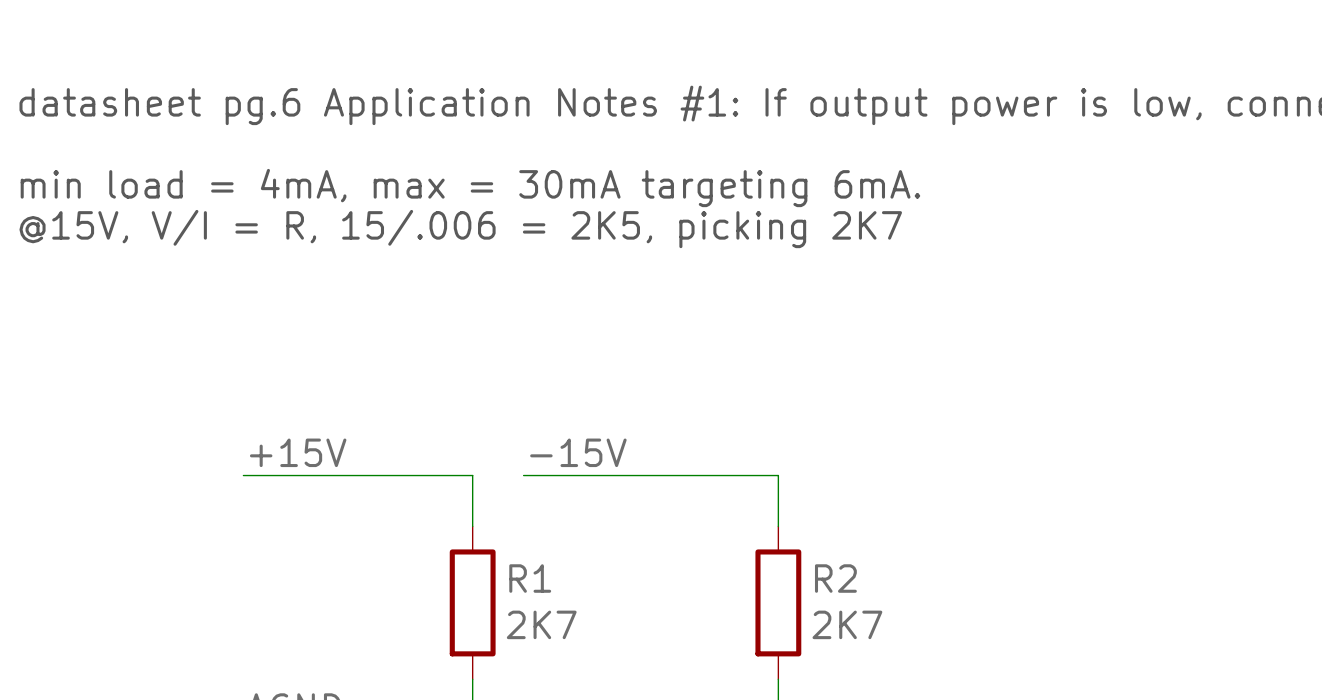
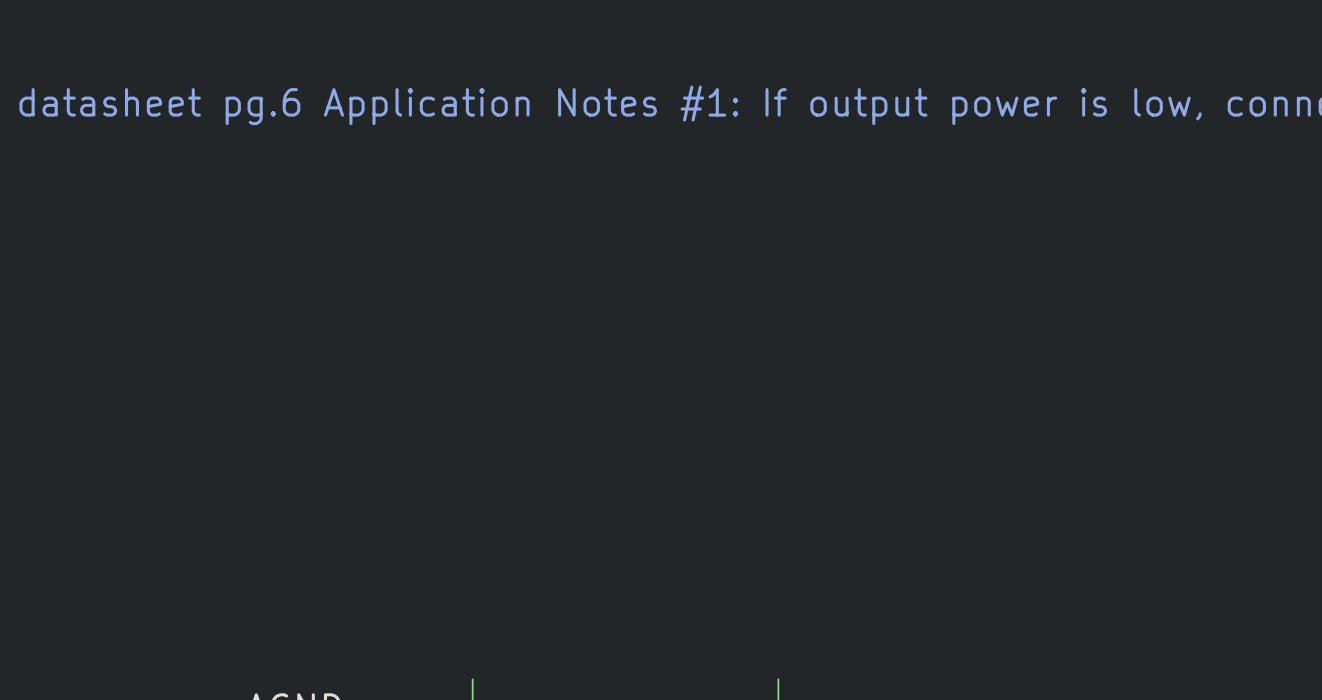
text: min load = 4mA, max = 30mA targeting 6mA. (470, 188) -> none
text: @15V, V/I = R, 15/.006 = 2K5, picking 2K7 (460, 229) -> none
label: +15V (298, 452) -> none
label: -15V (578, 452) -> none
wire: (243, 475) (472, 475) (472, 526) -> none
wire: (523, 475) (778, 475) (778, 526) -> none
R1: 2K7 (472, 602) -> none
R2: 2K7 (778, 602) -> none

